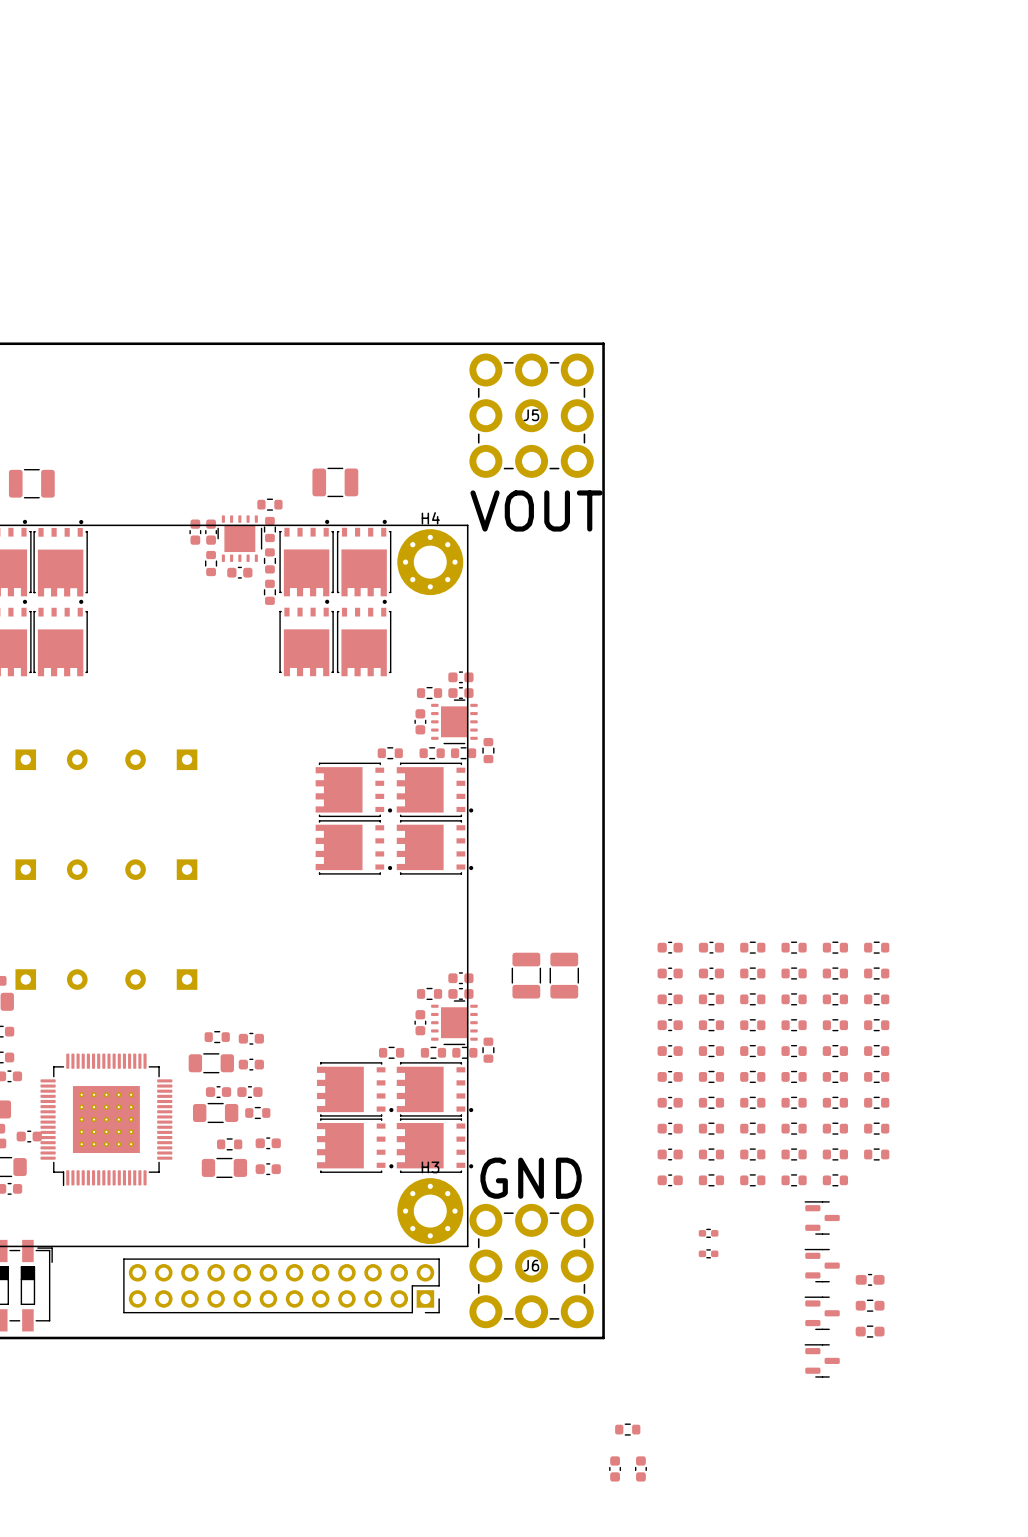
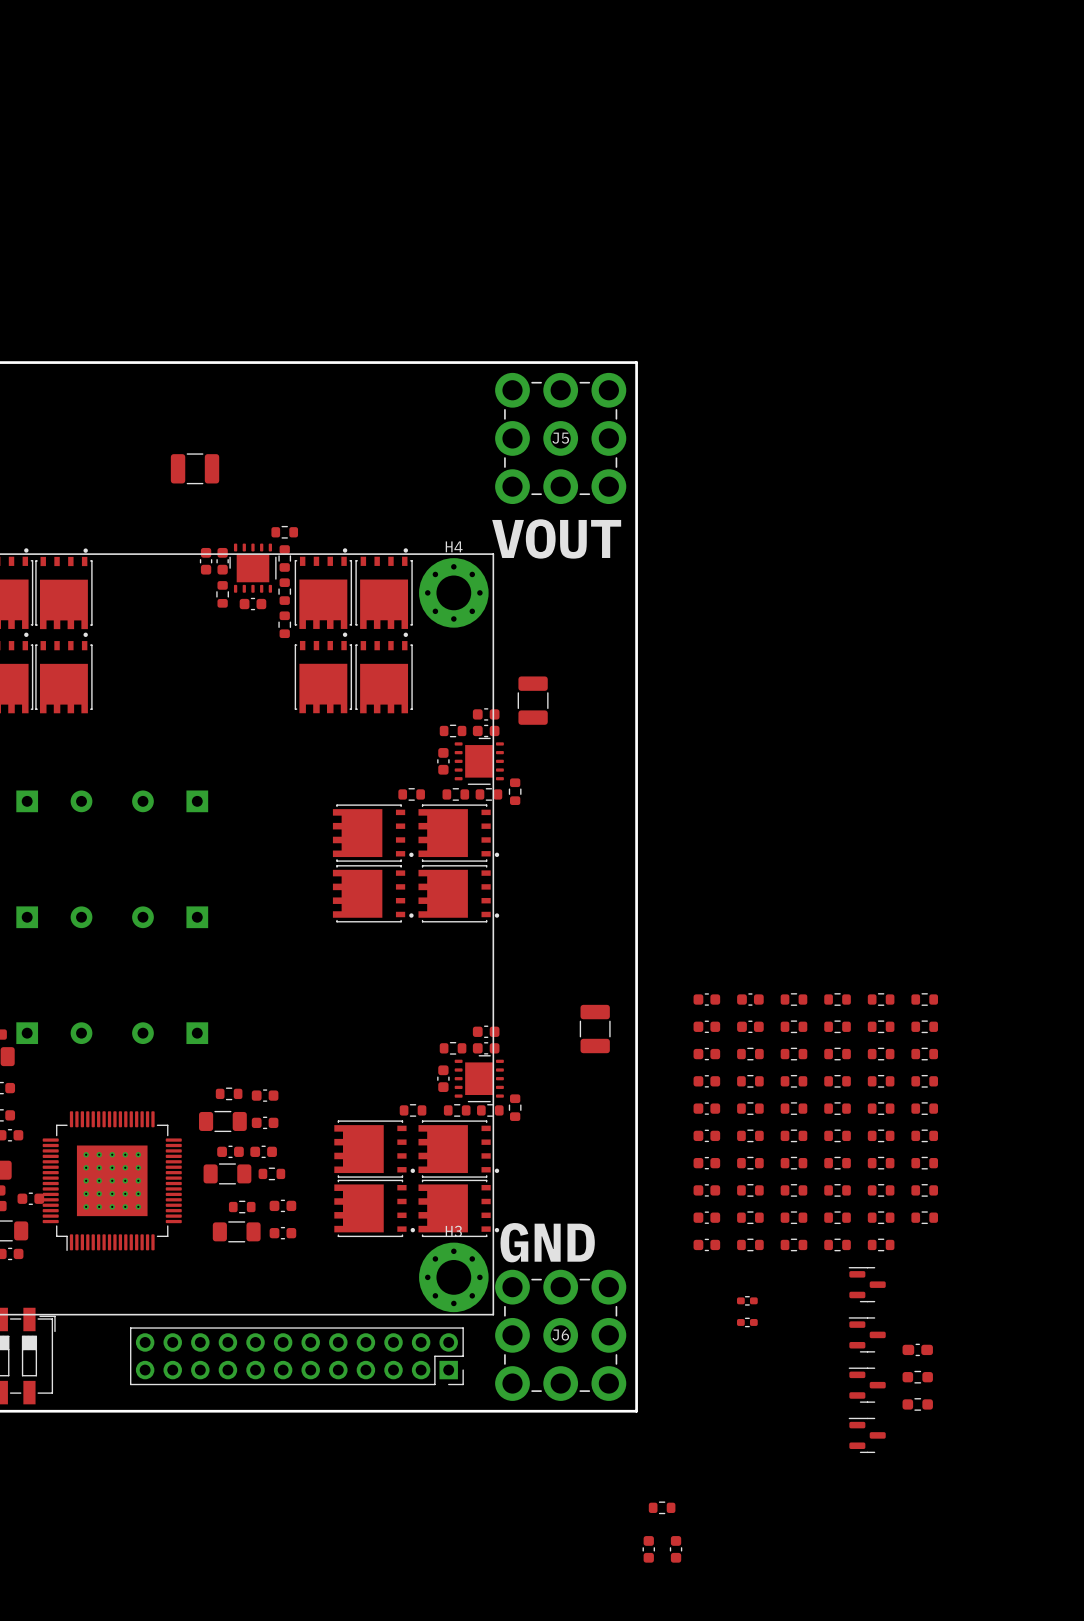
part: none -> (195, 468)
part: (335, 482) -> none
part: (31, 483) -> none
part: none -> (533, 700)
part: (526, 975) -> none

